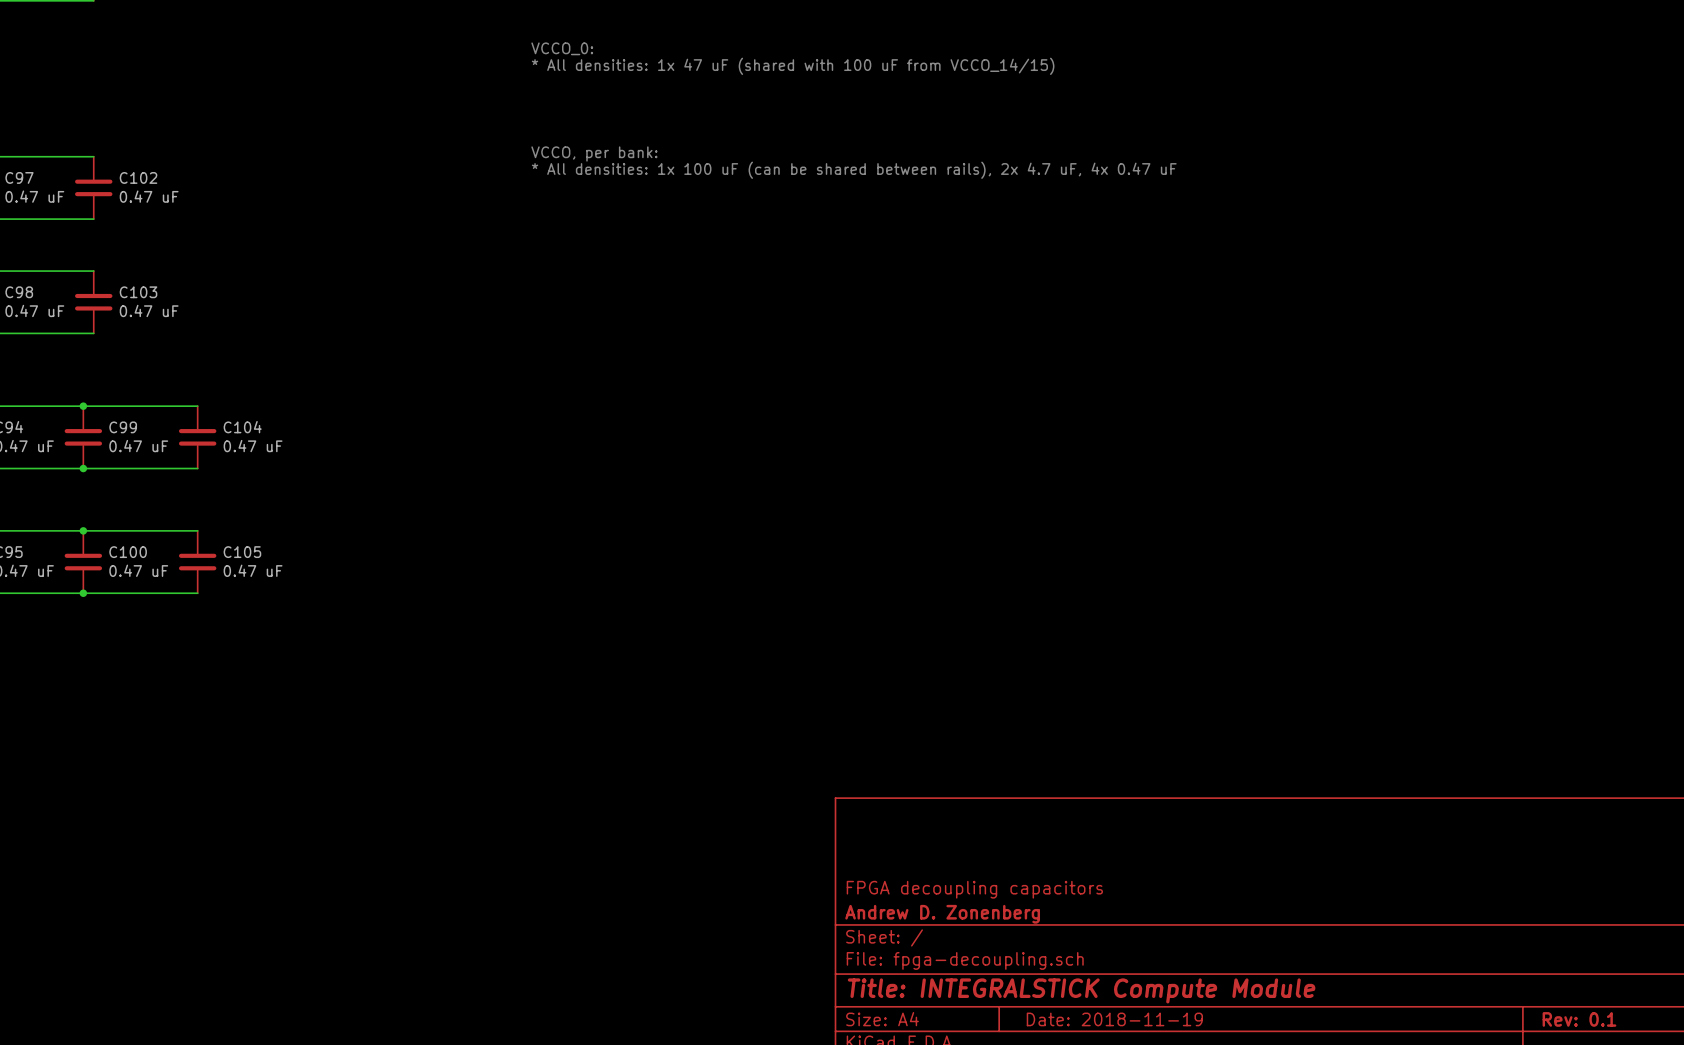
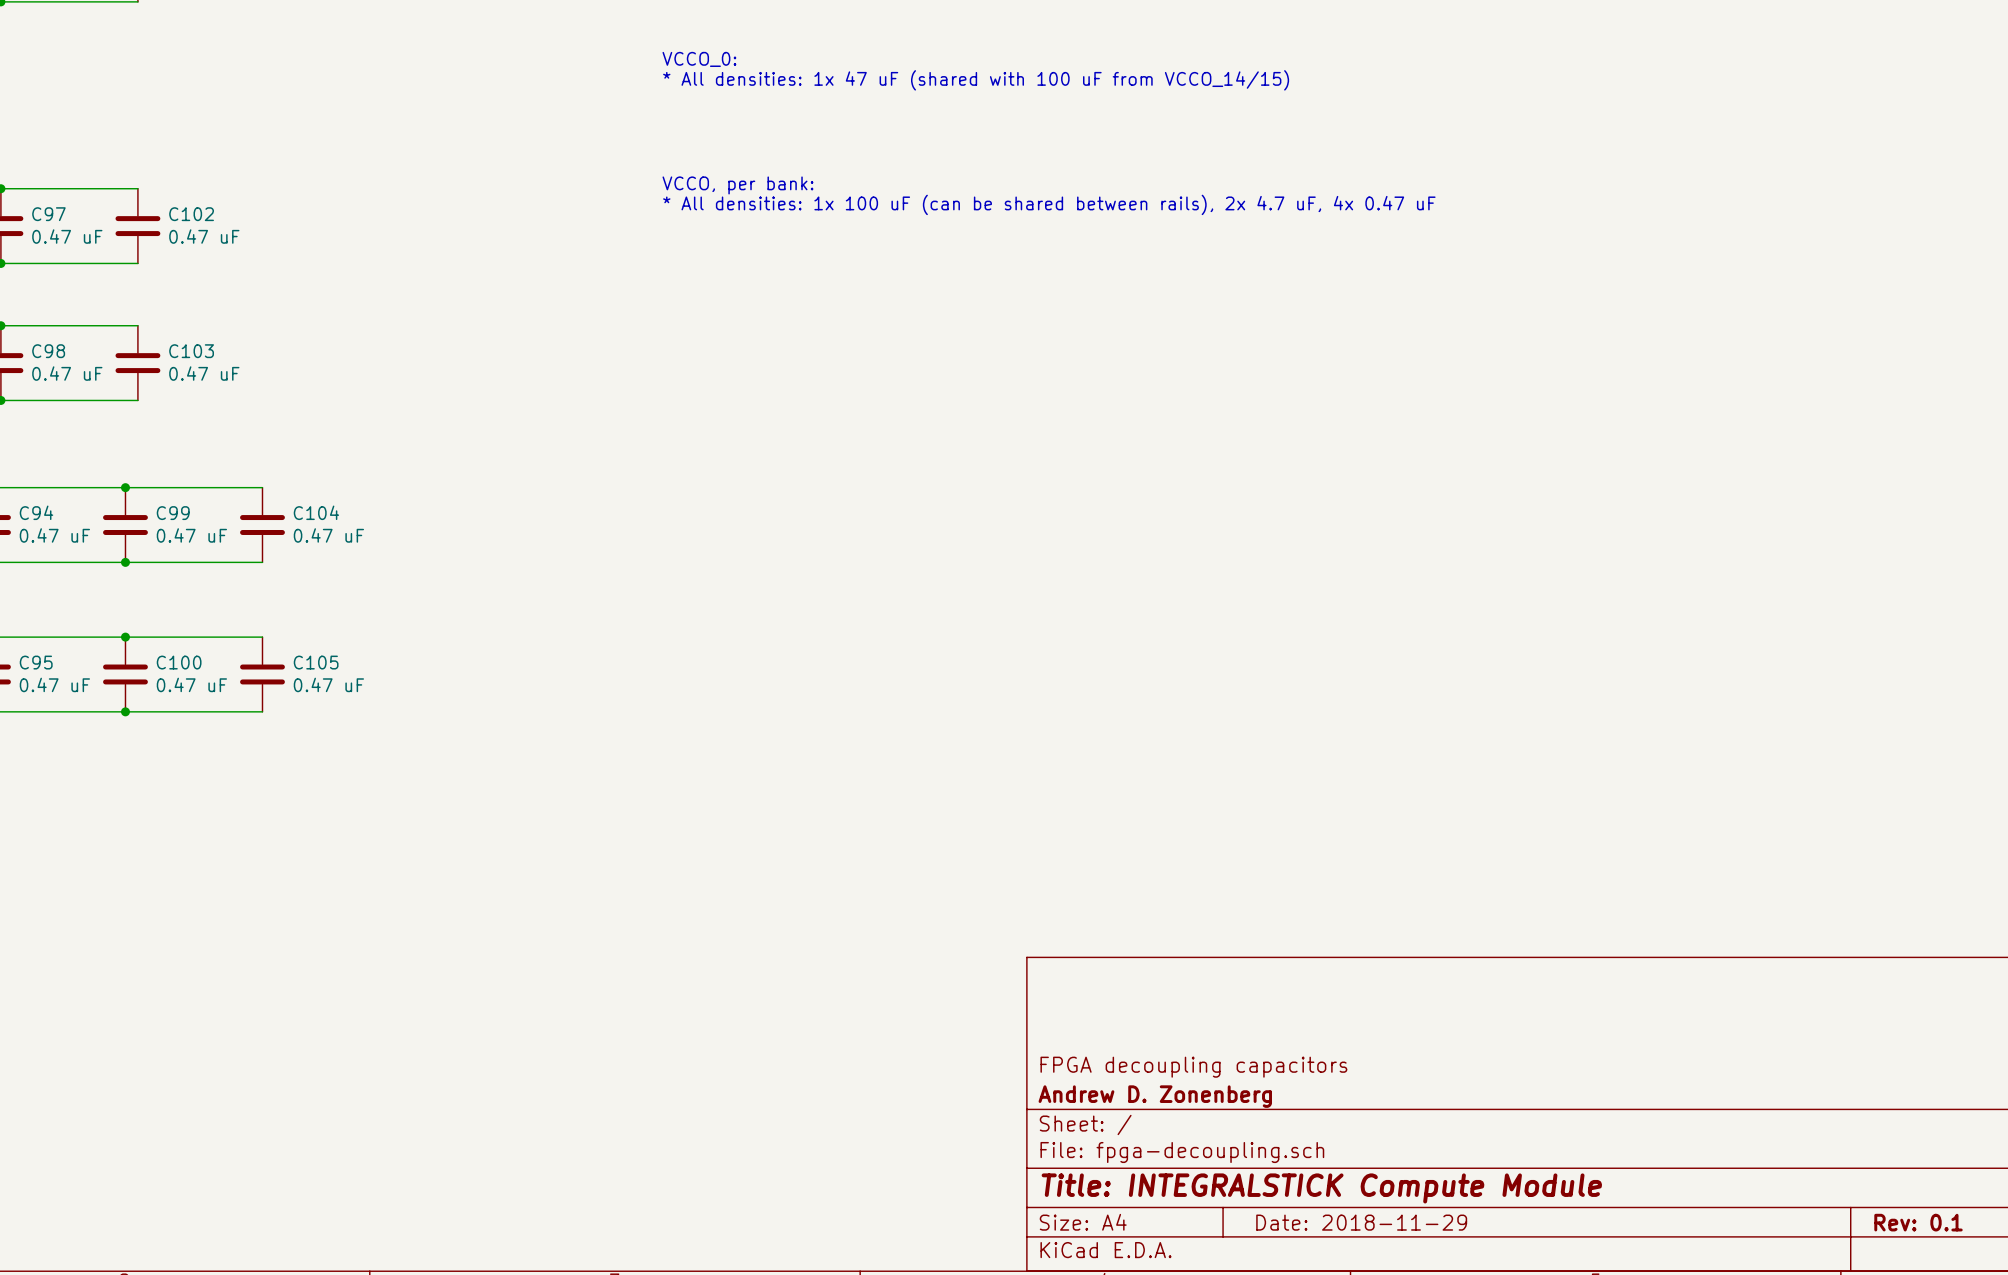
title block: Date: 2018-11-19 (1114, 1019) -> Date: 2018-11-29 (1361, 1222)

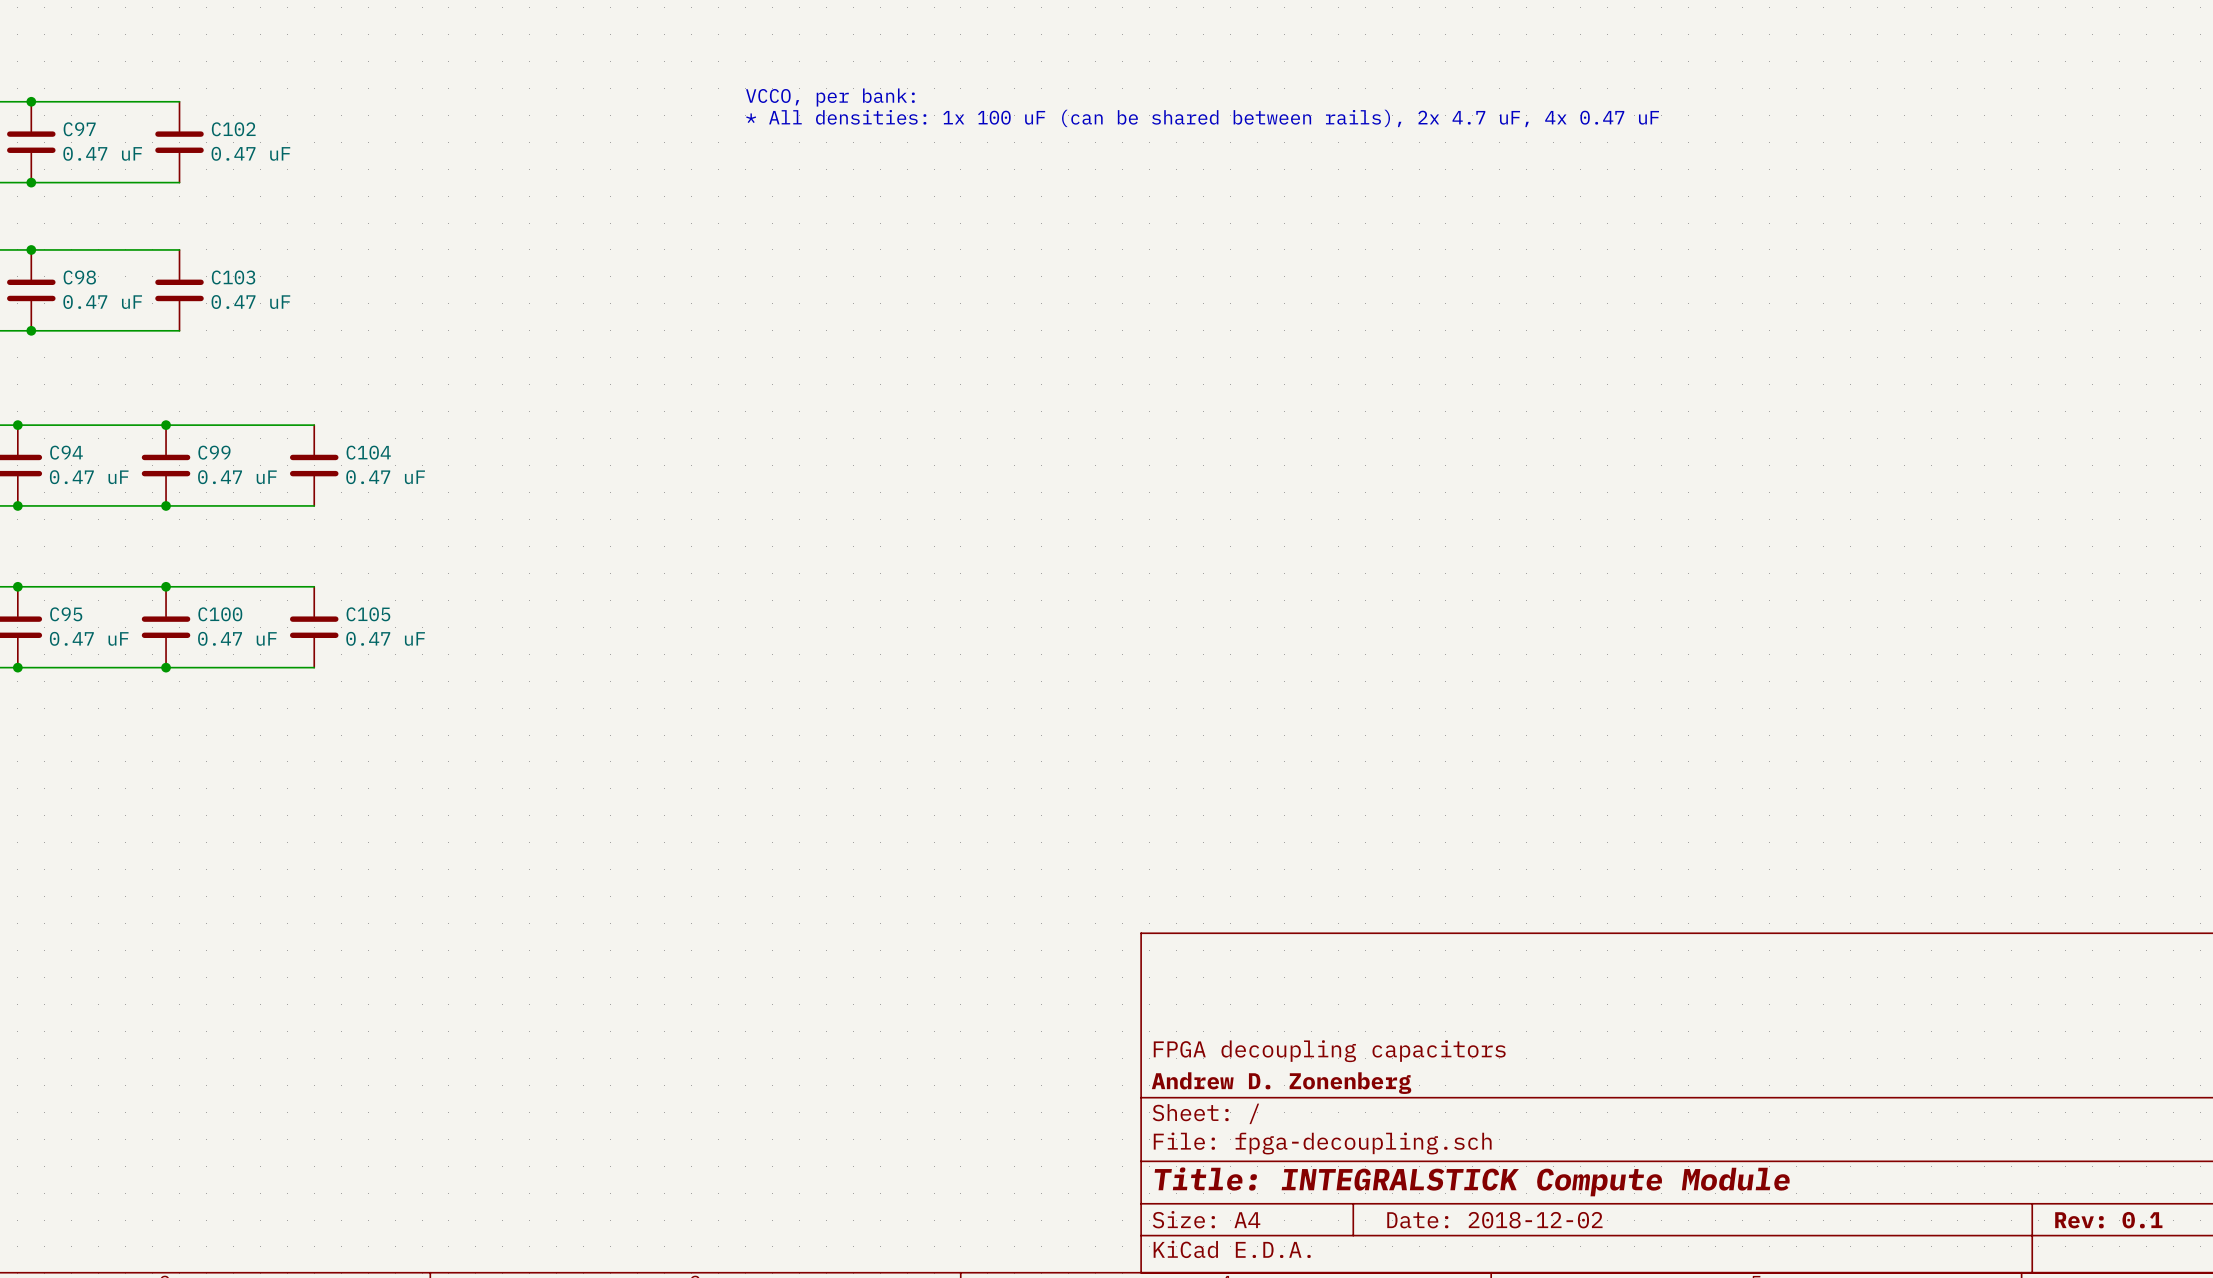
title block: Date: 2018-11-29 (1361, 1222) -> Date: 2018-12-02 (1494, 1220)

